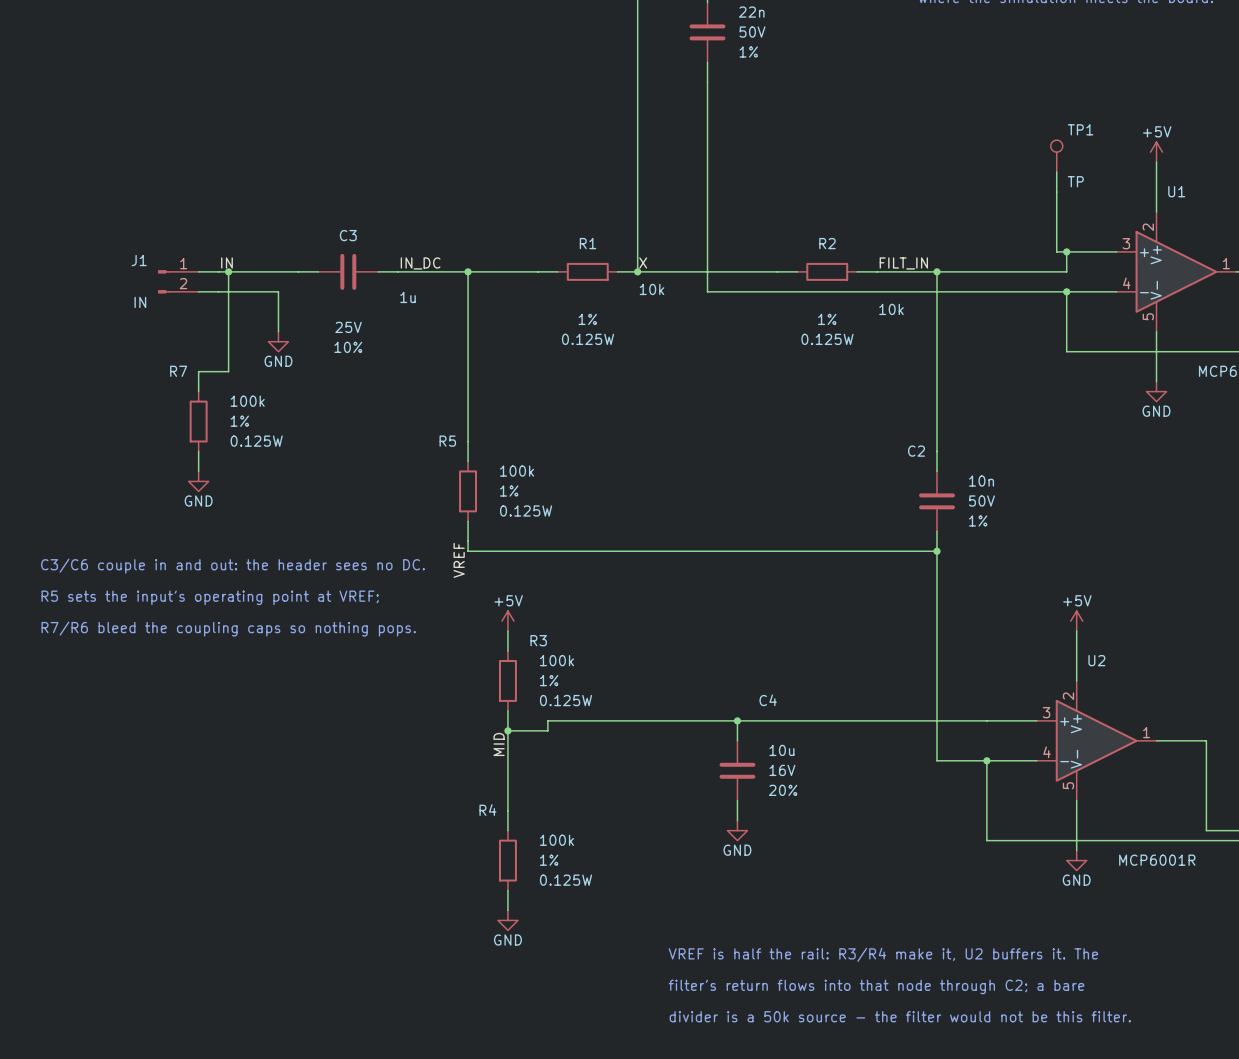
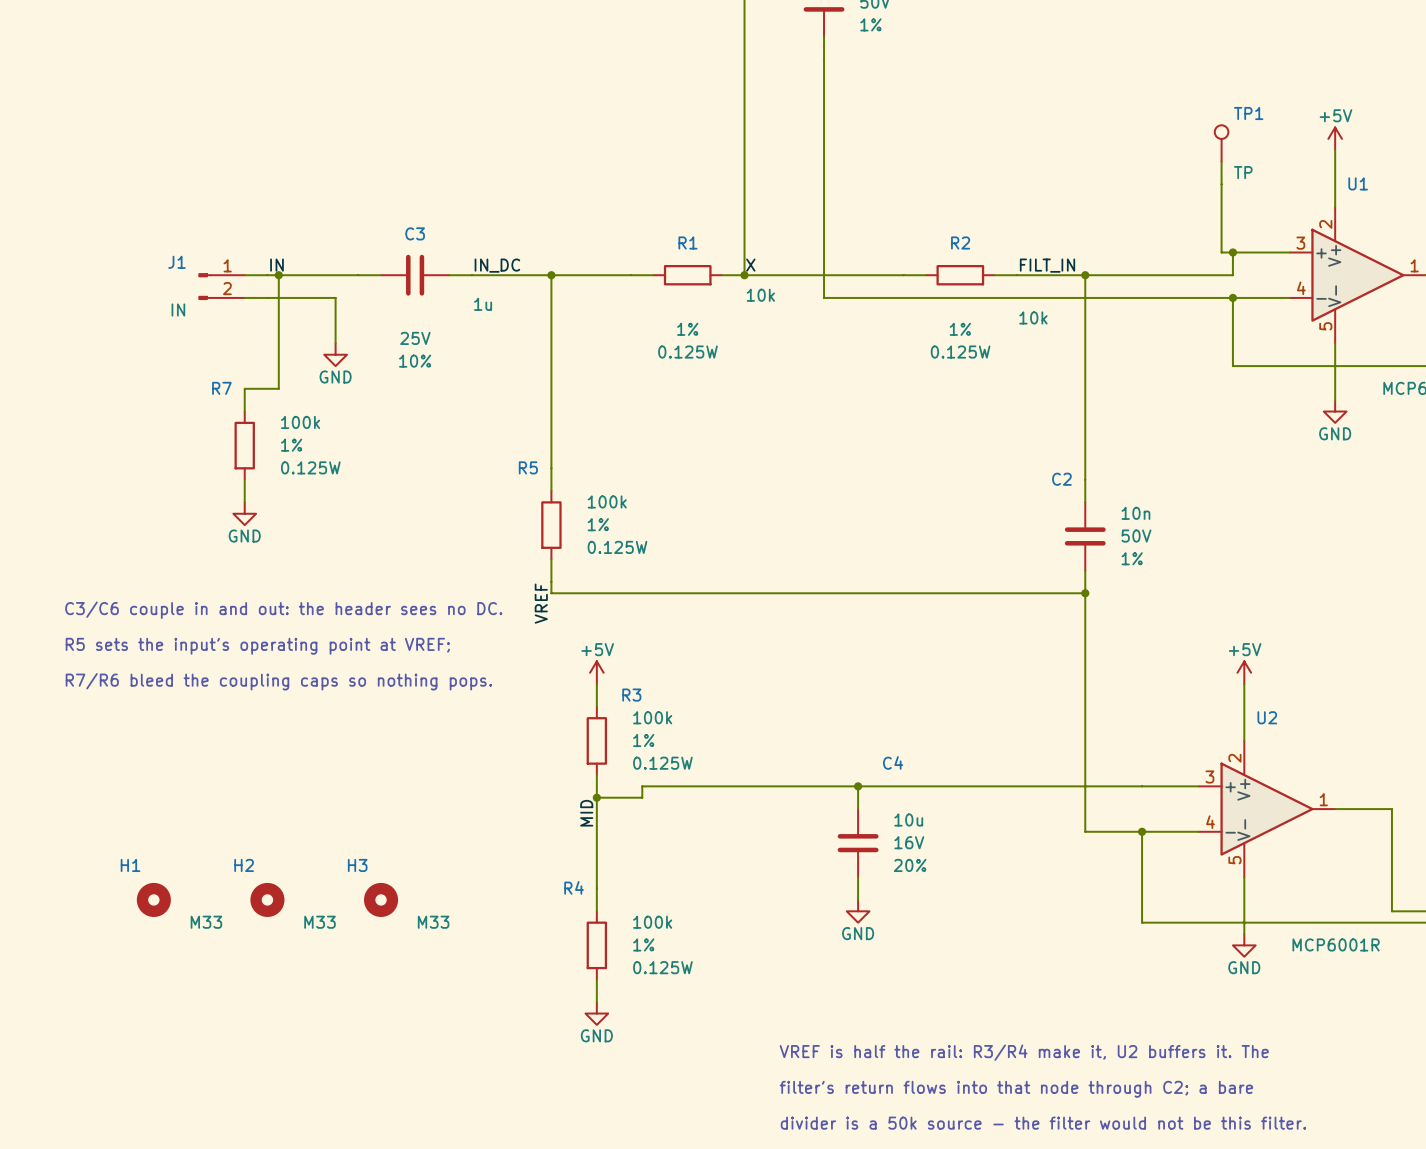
H1: none -> M33 (153, 899)
H2: none -> M33 (267, 899)
H3: none -> M33 (381, 899)

